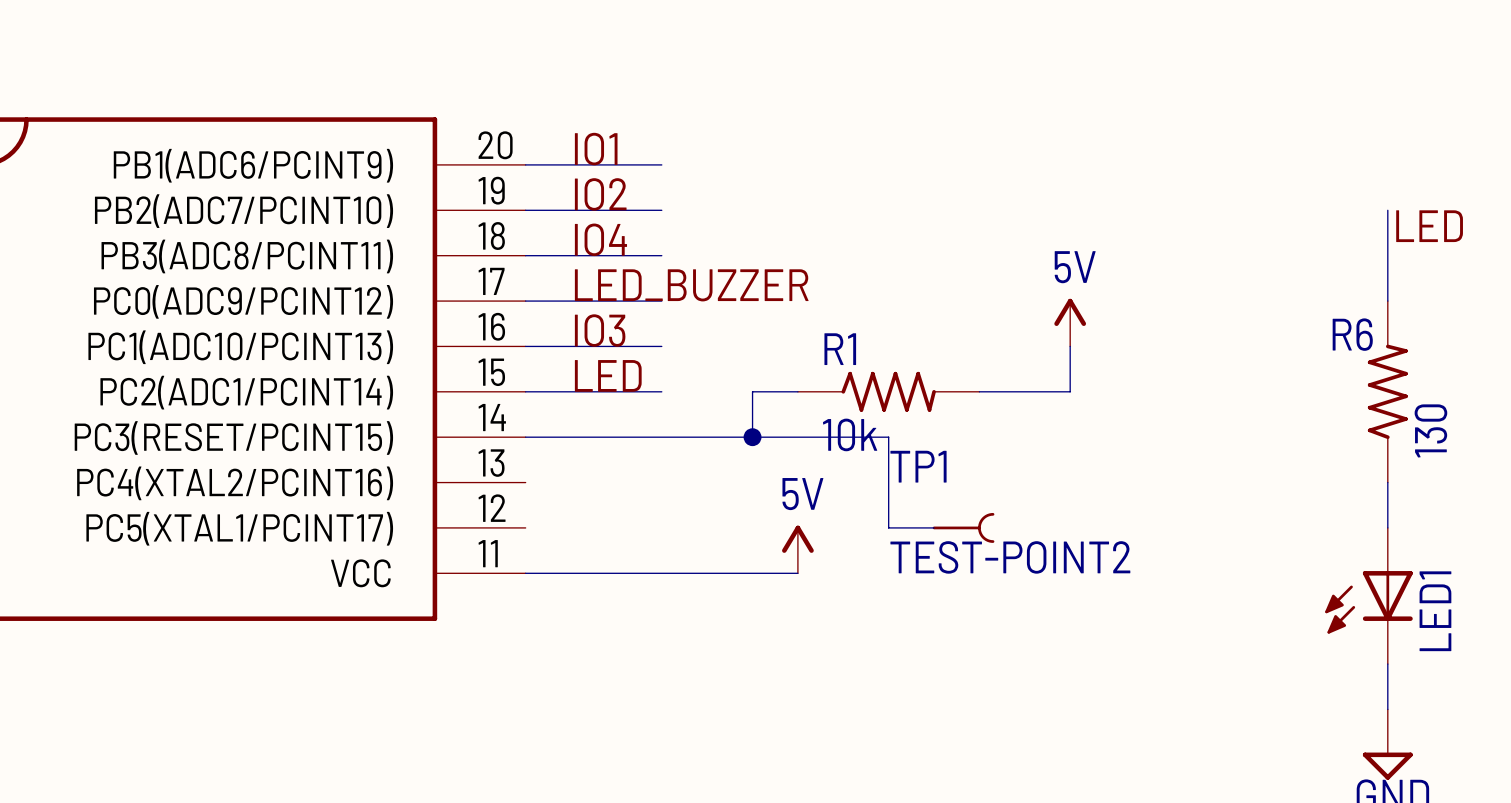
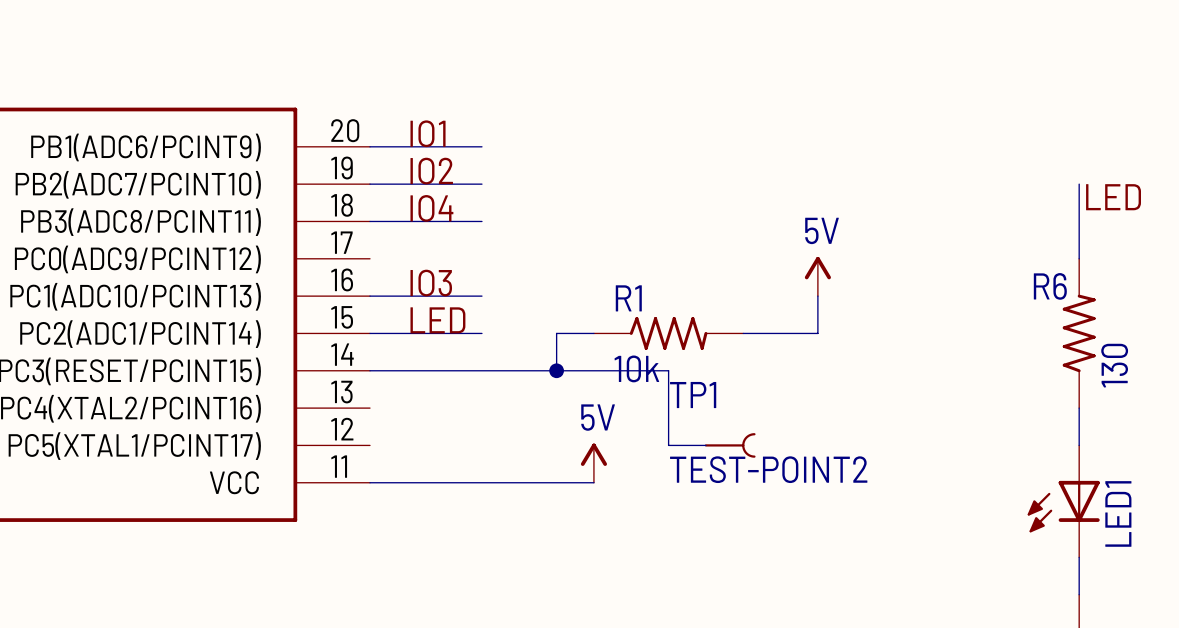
label: LED_BUZZER (691, 285) -> none
wire: (525, 301) (661, 301) -> none

